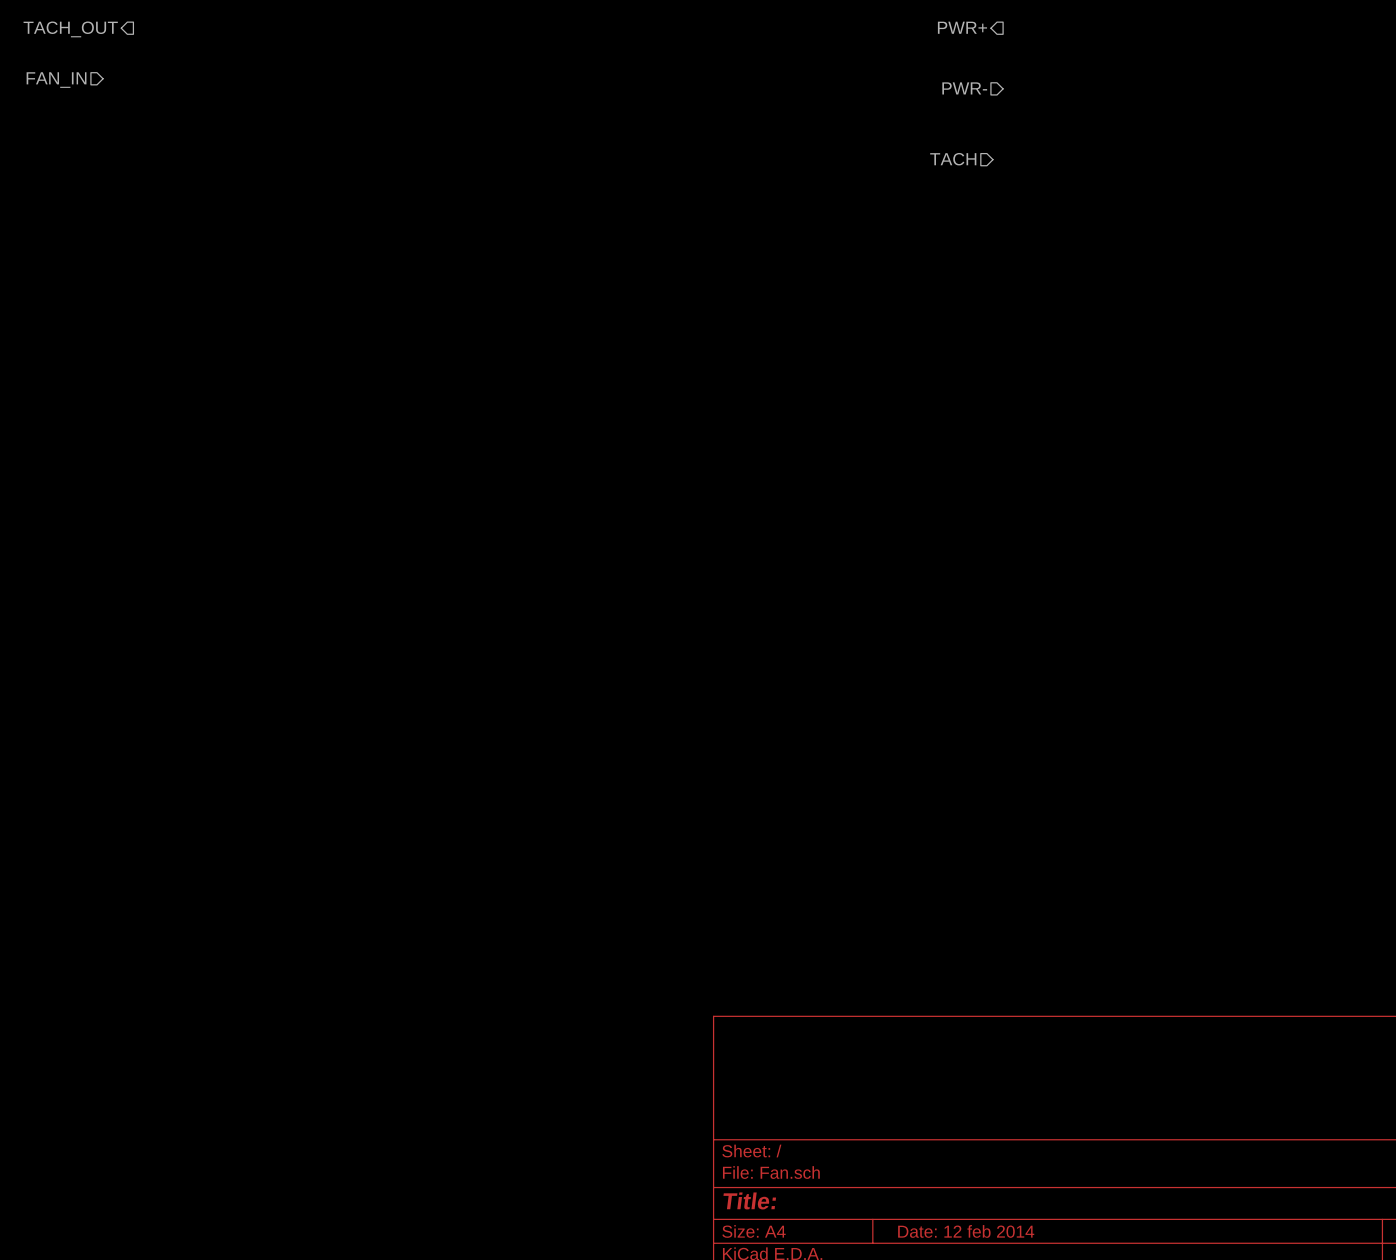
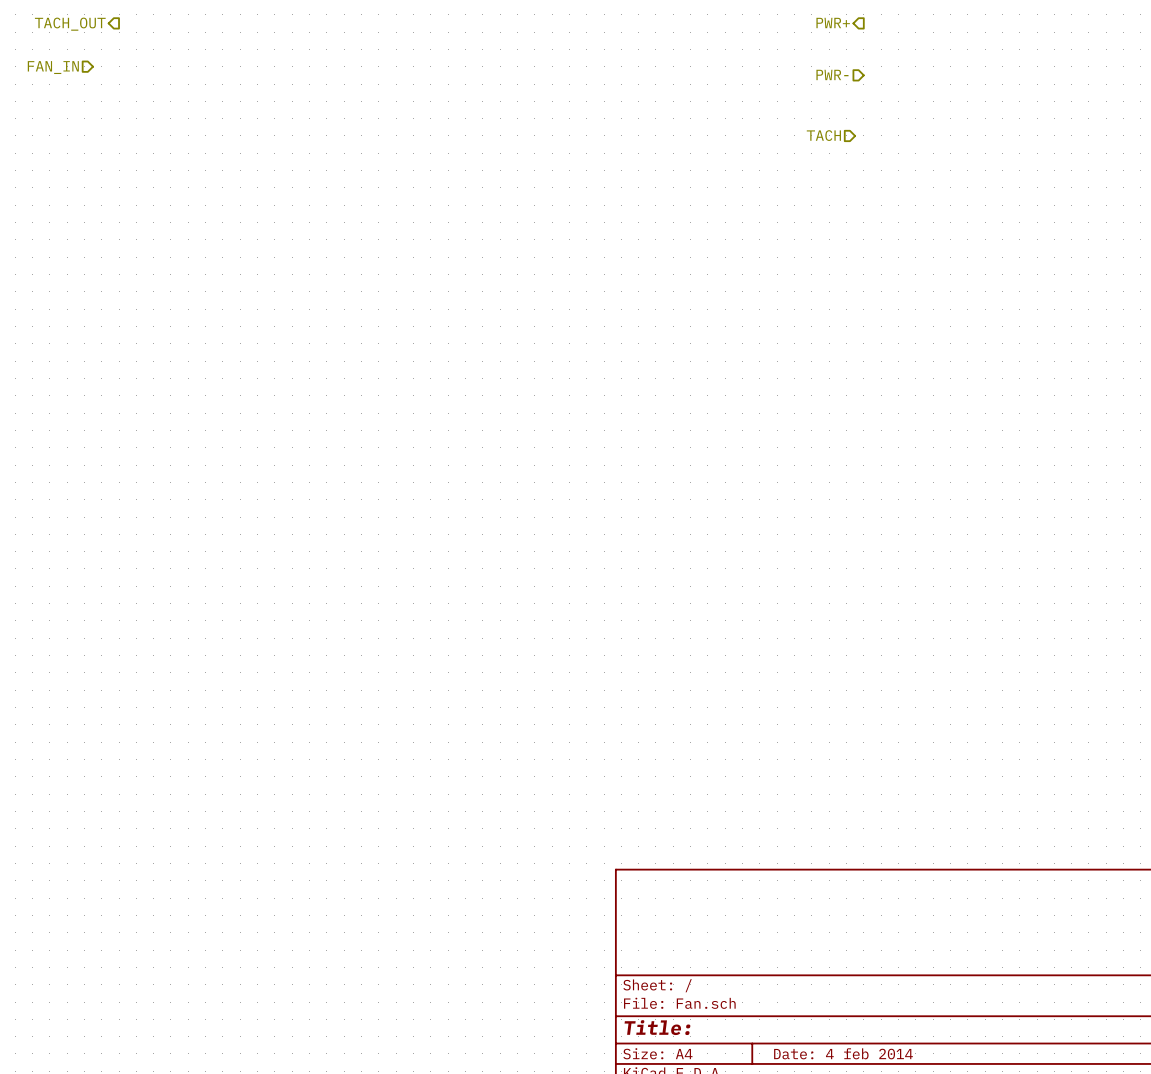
title block: Date: 12 feb 2014 (966, 1231) -> Date: 4 feb 2014 (843, 1053)

